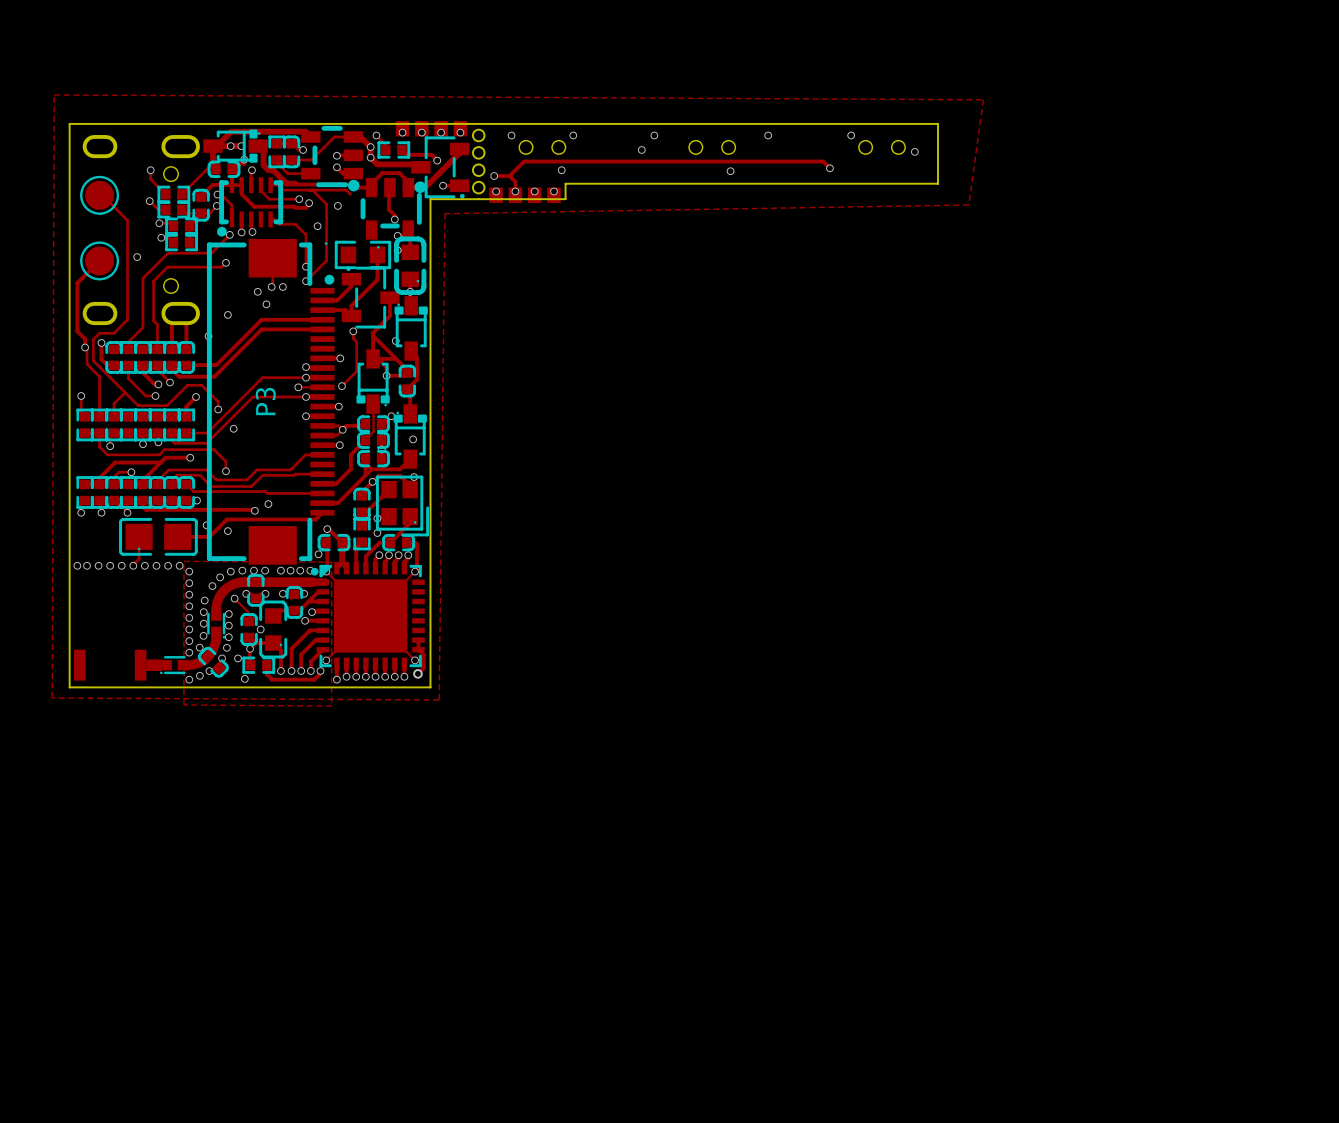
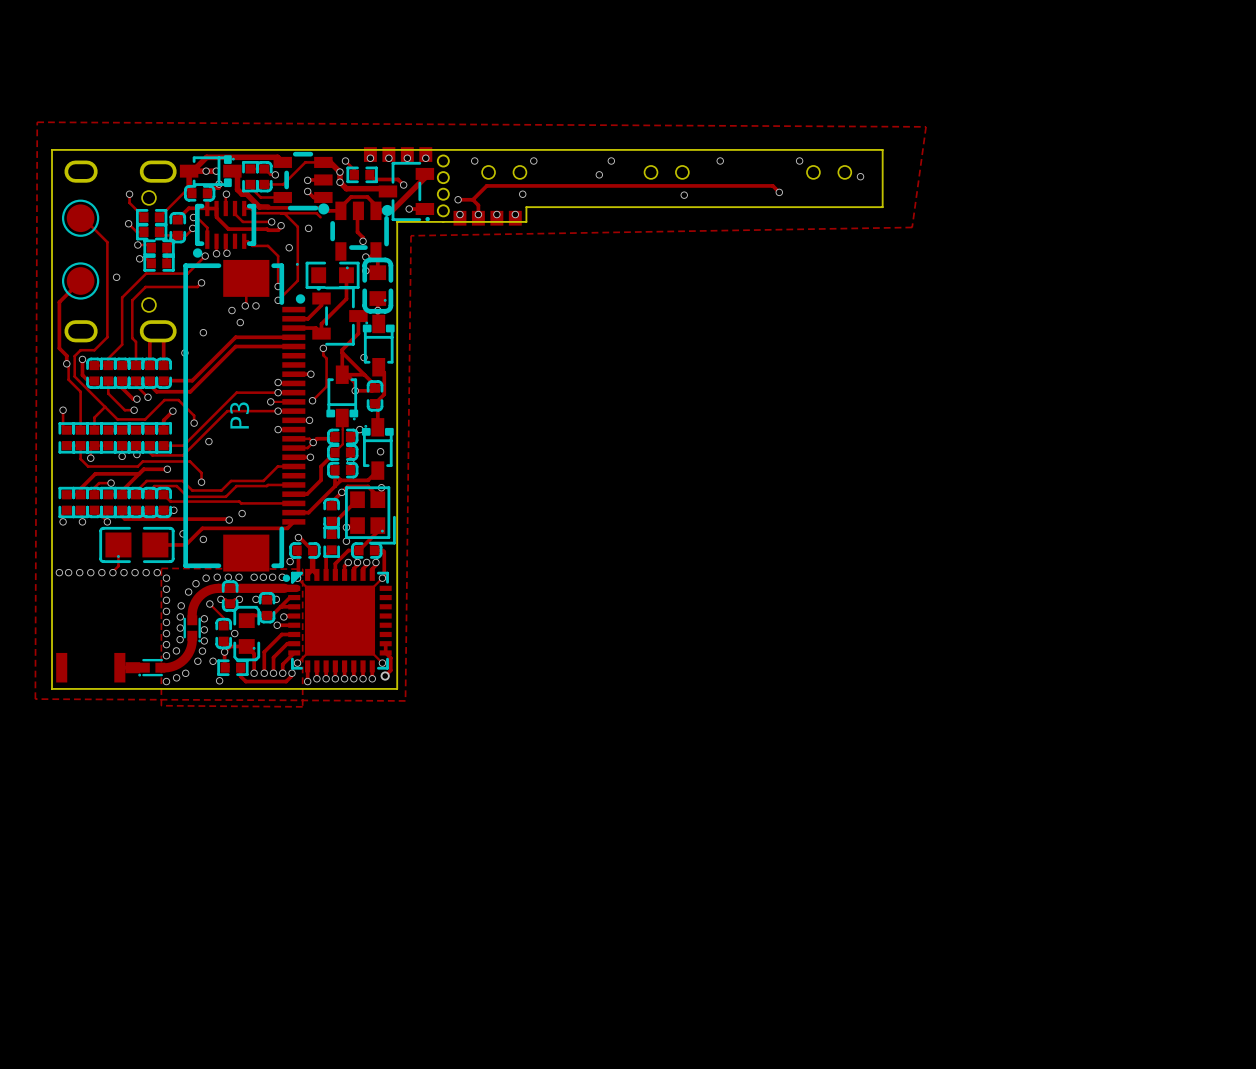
part: (213, 662) -> none

